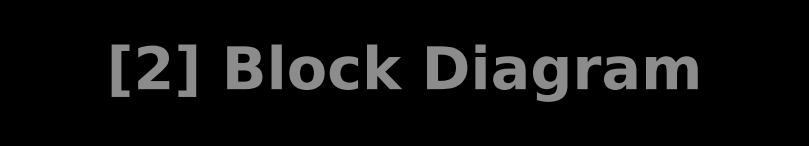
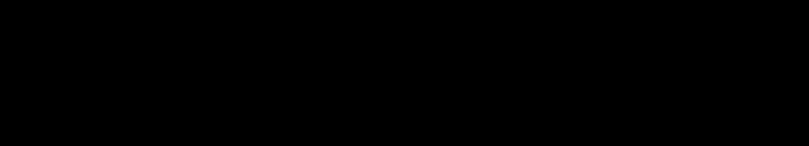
text: [2] Block Diagram (404, 73) -> none

